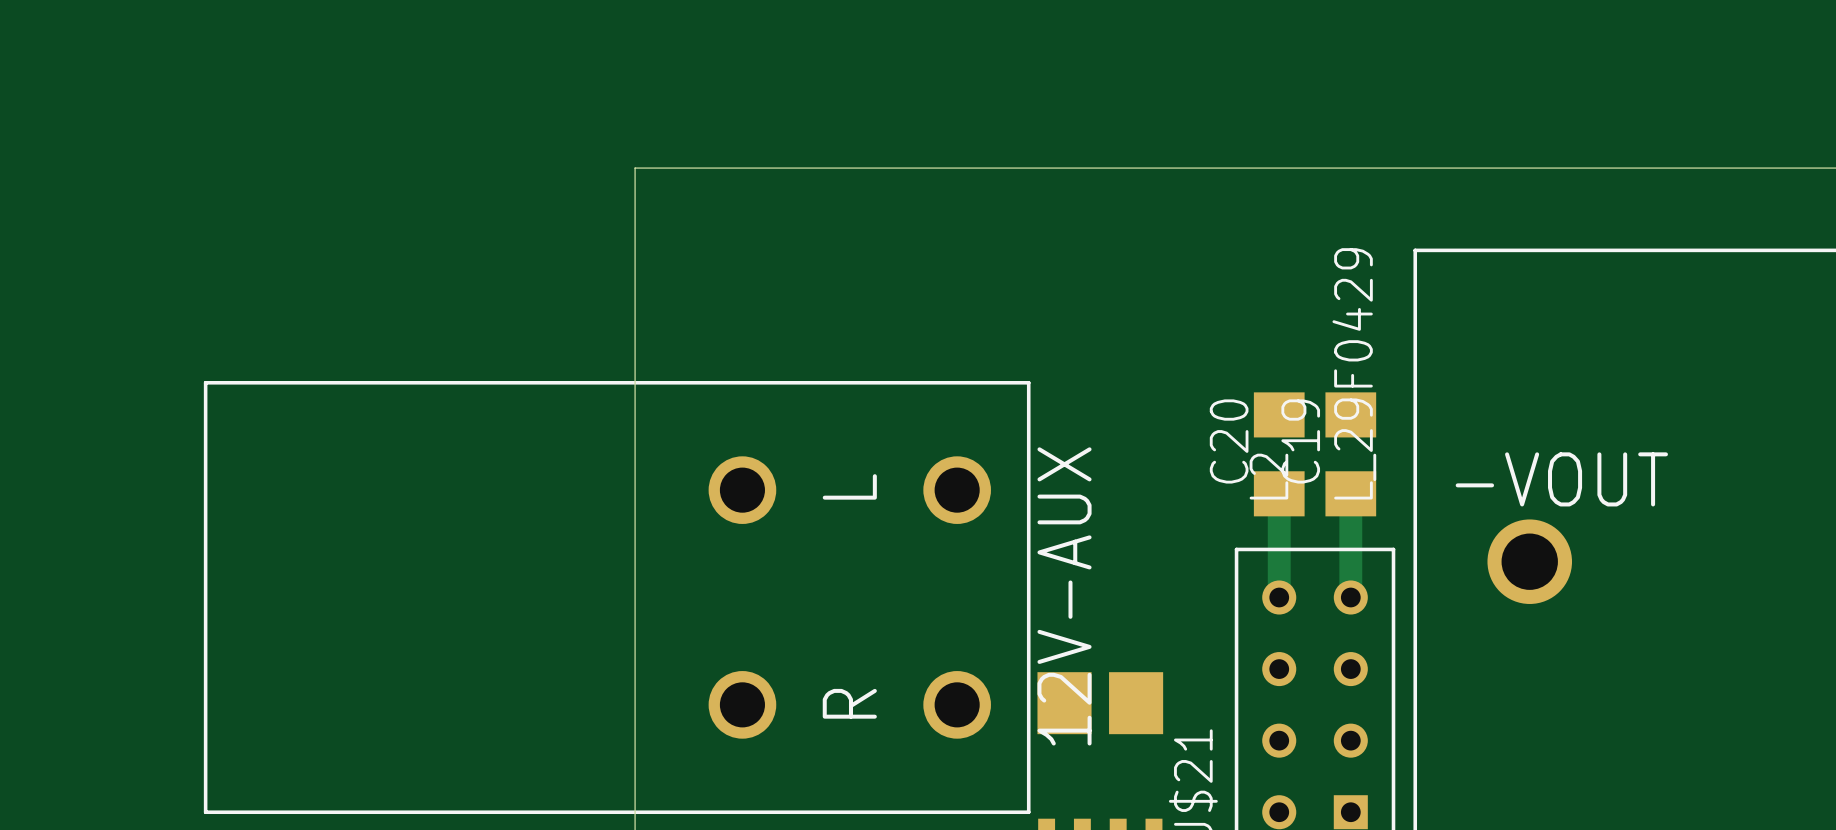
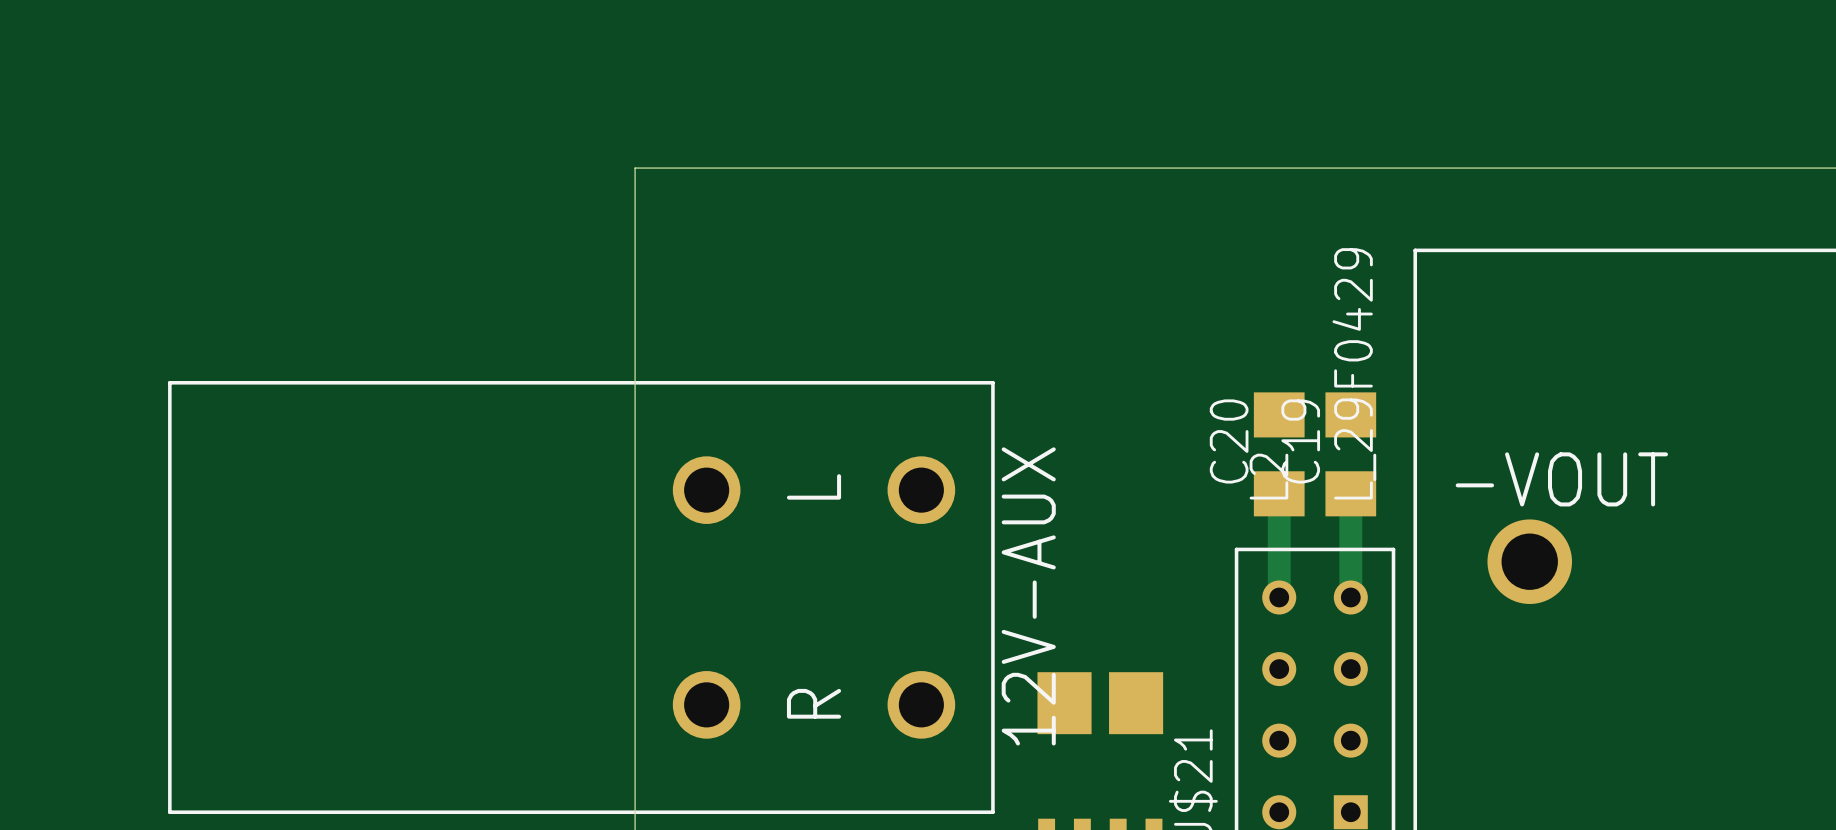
12V-AUX position: (617, 597) -> (581, 597)

